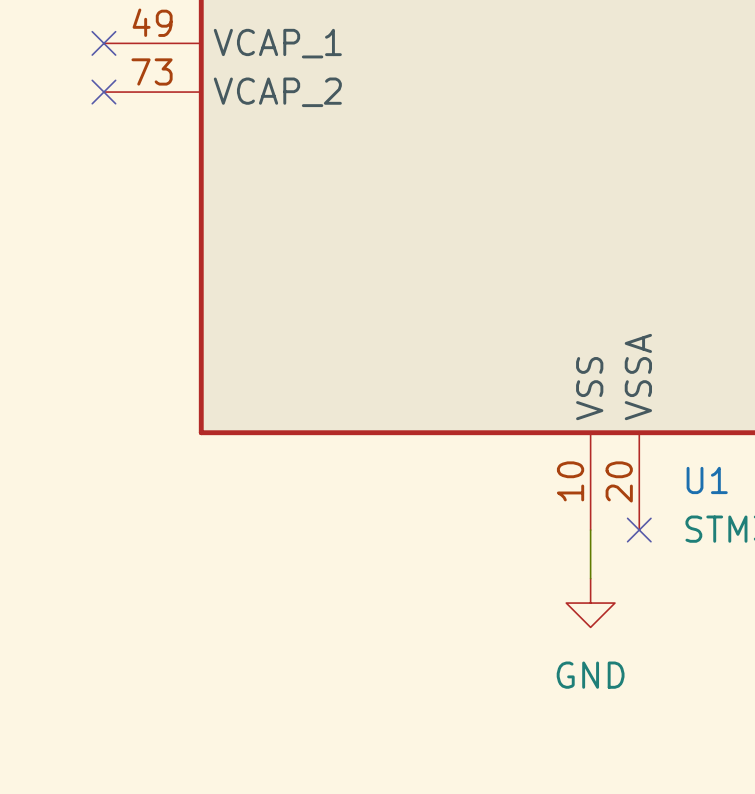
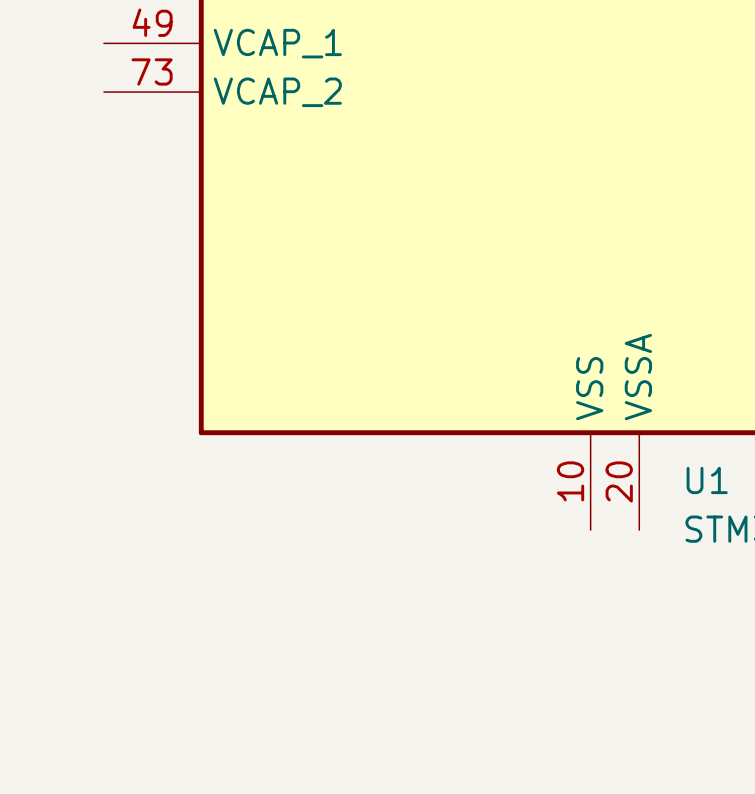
no-connect mark: (103, 43) -> none
no-connect mark: (103, 92) -> none
wire: (590, 530) (590, 578) -> none
no-connect mark: (639, 530) -> none
power symbol: GND (590, 603) -> none

